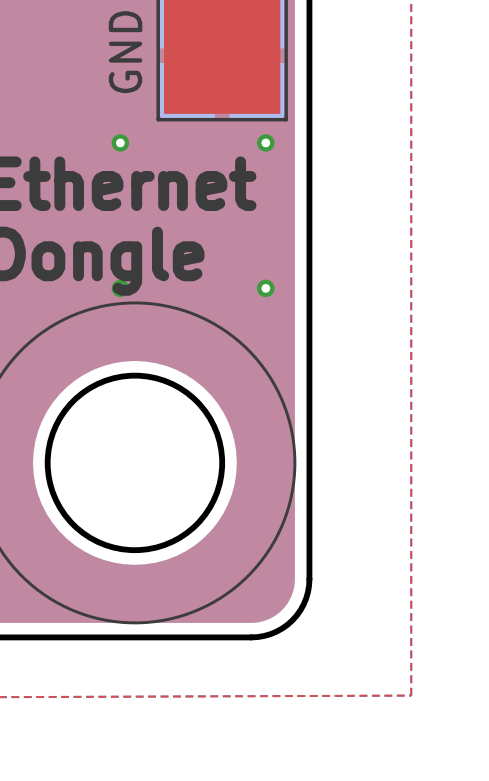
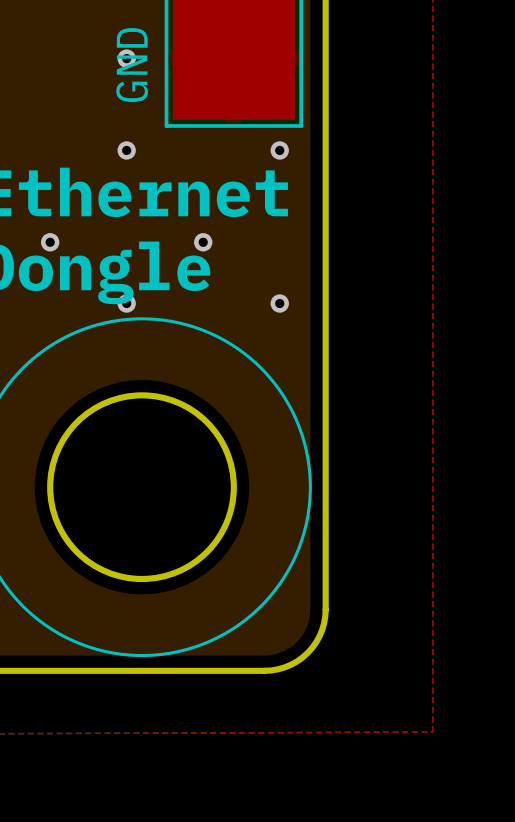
via: none -> (126, 58)
via: none -> (50, 242)
via: none -> (203, 242)

